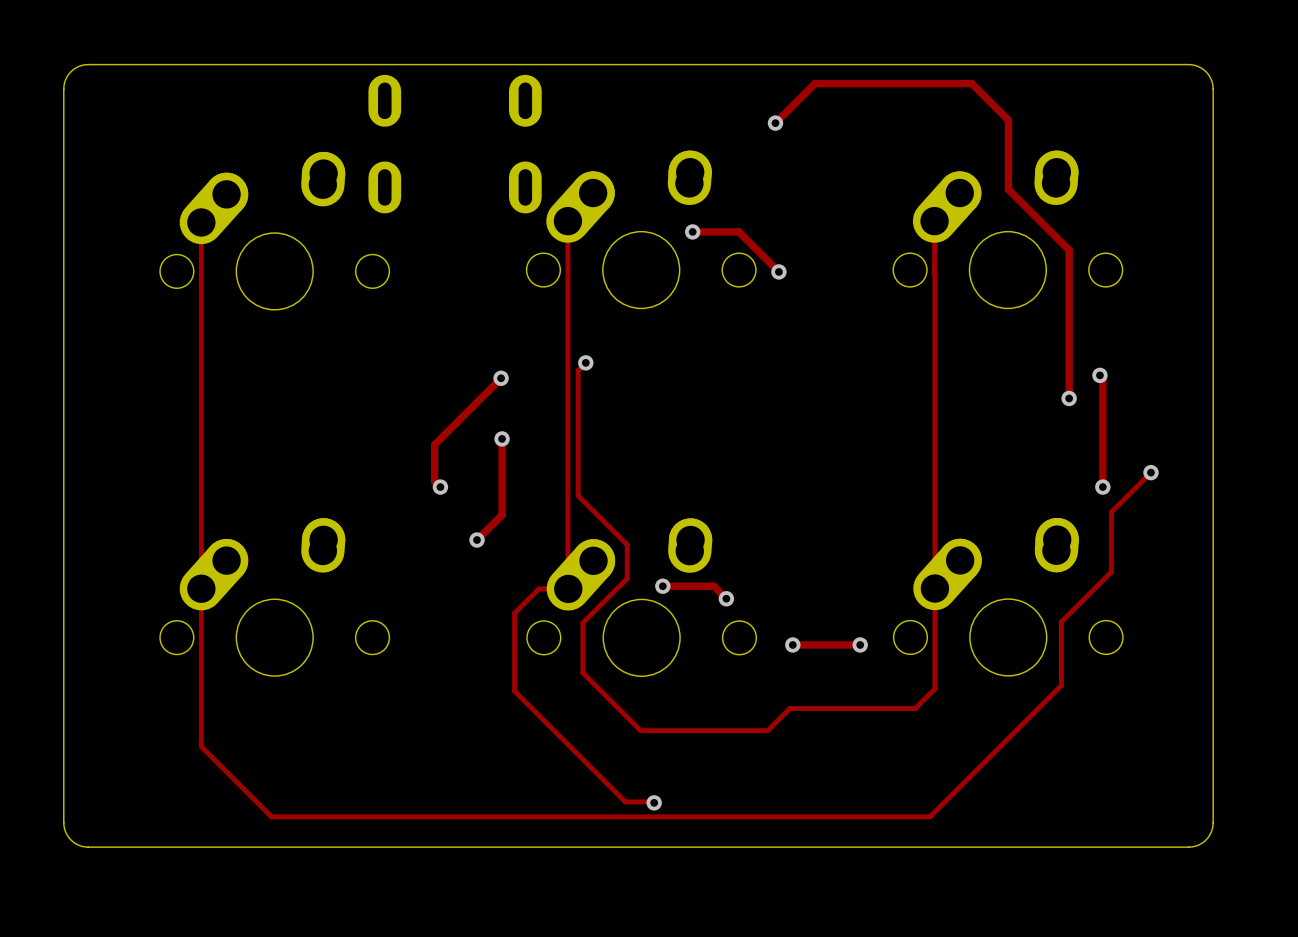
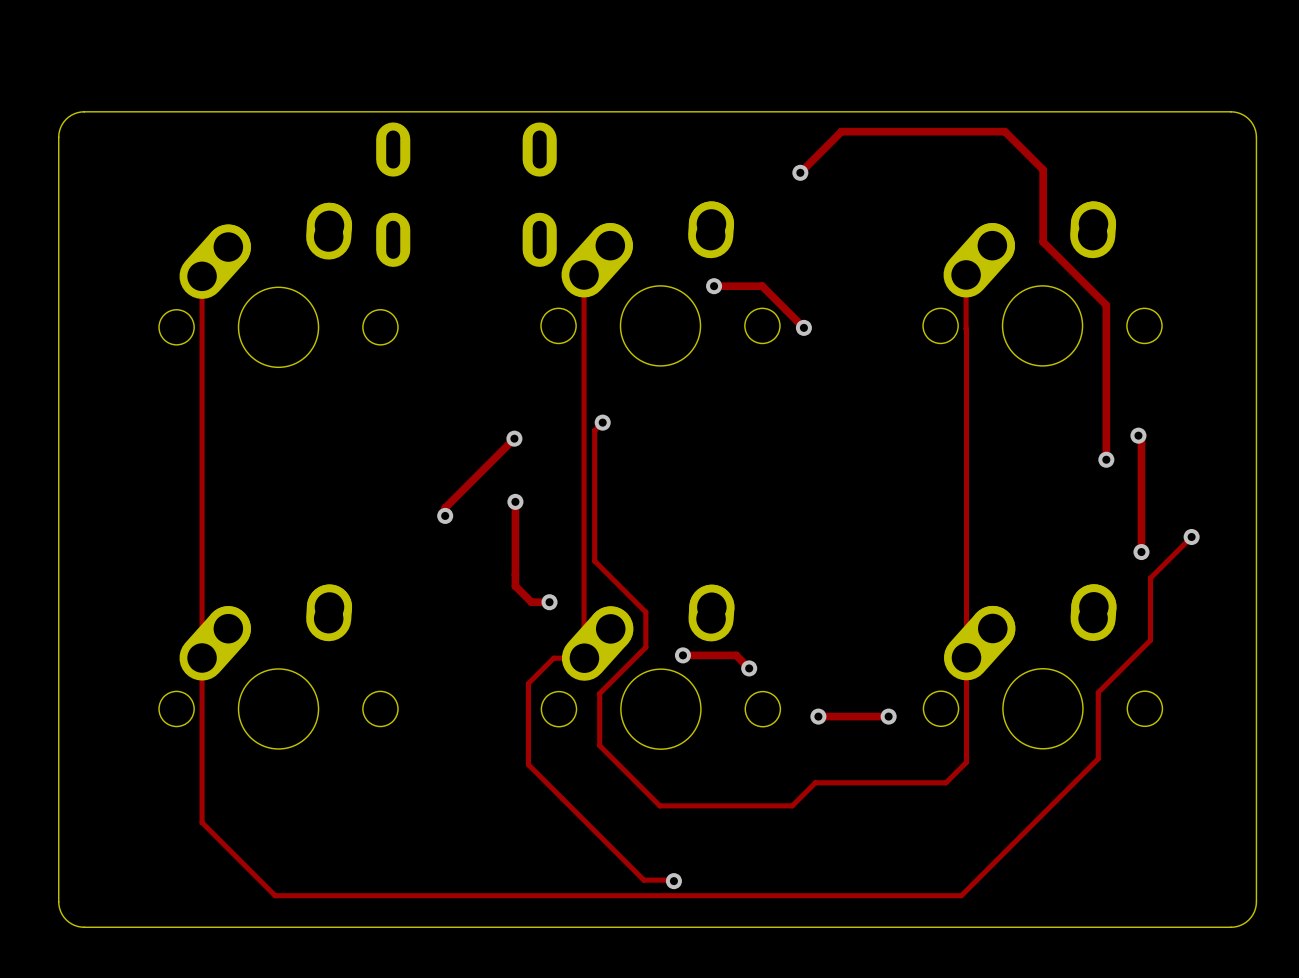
track: (434, 452) (434, 481) (440, 487) -> none
via position: (440, 487) -> (445, 515)
track: (502, 514) (477, 540) -> (515, 581) (515, 586) (531, 602) (549, 602)
via: none -> (549, 602)
via: (477, 540) -> none

